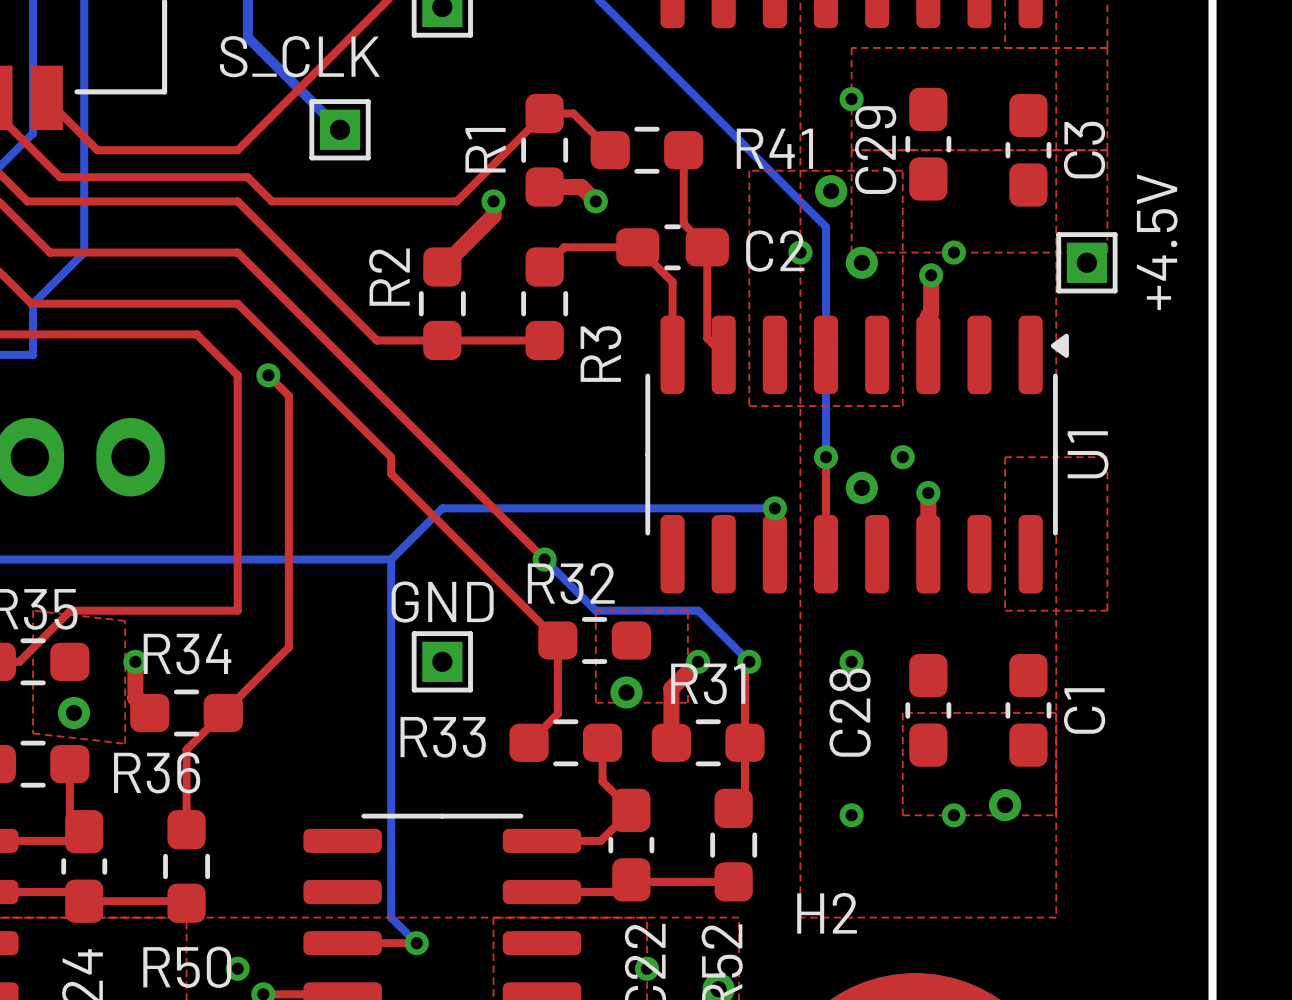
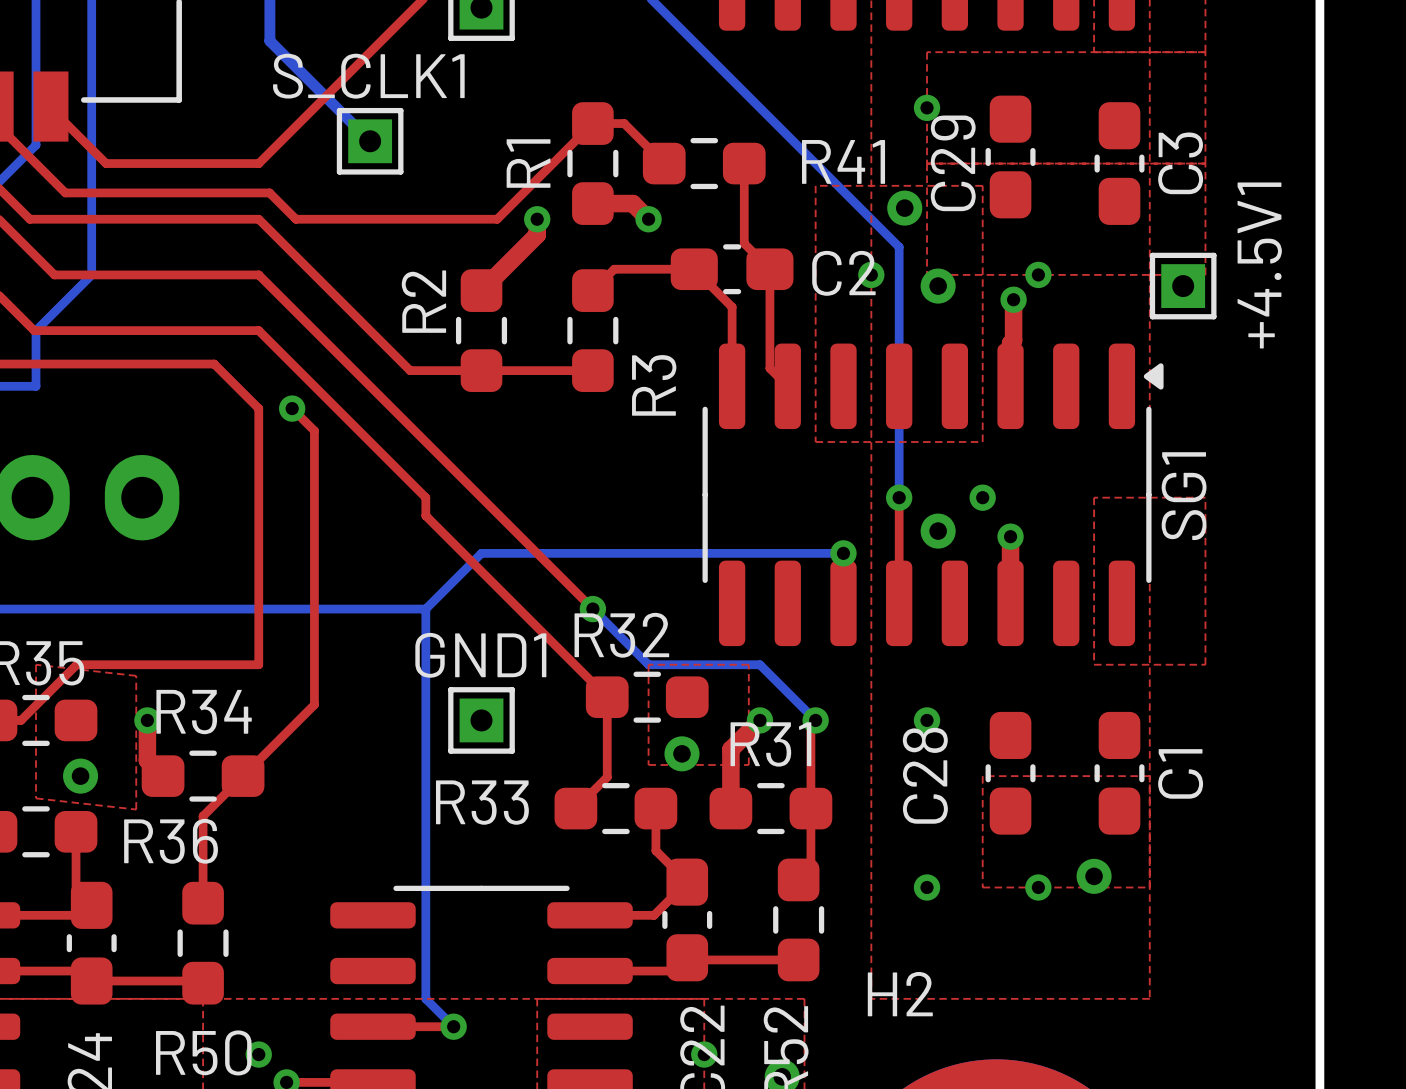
S_CLK name: S_CLK (299, 56) -> S_CLK1 (368, 76)
+4.5V name: +4.5V (1157, 242) -> +4.5V1 (1259, 265)
U1 name: U1 (1088, 454) -> SG1 (1184, 496)
GND name: GND (442, 602) -> GND1 (480, 655)

